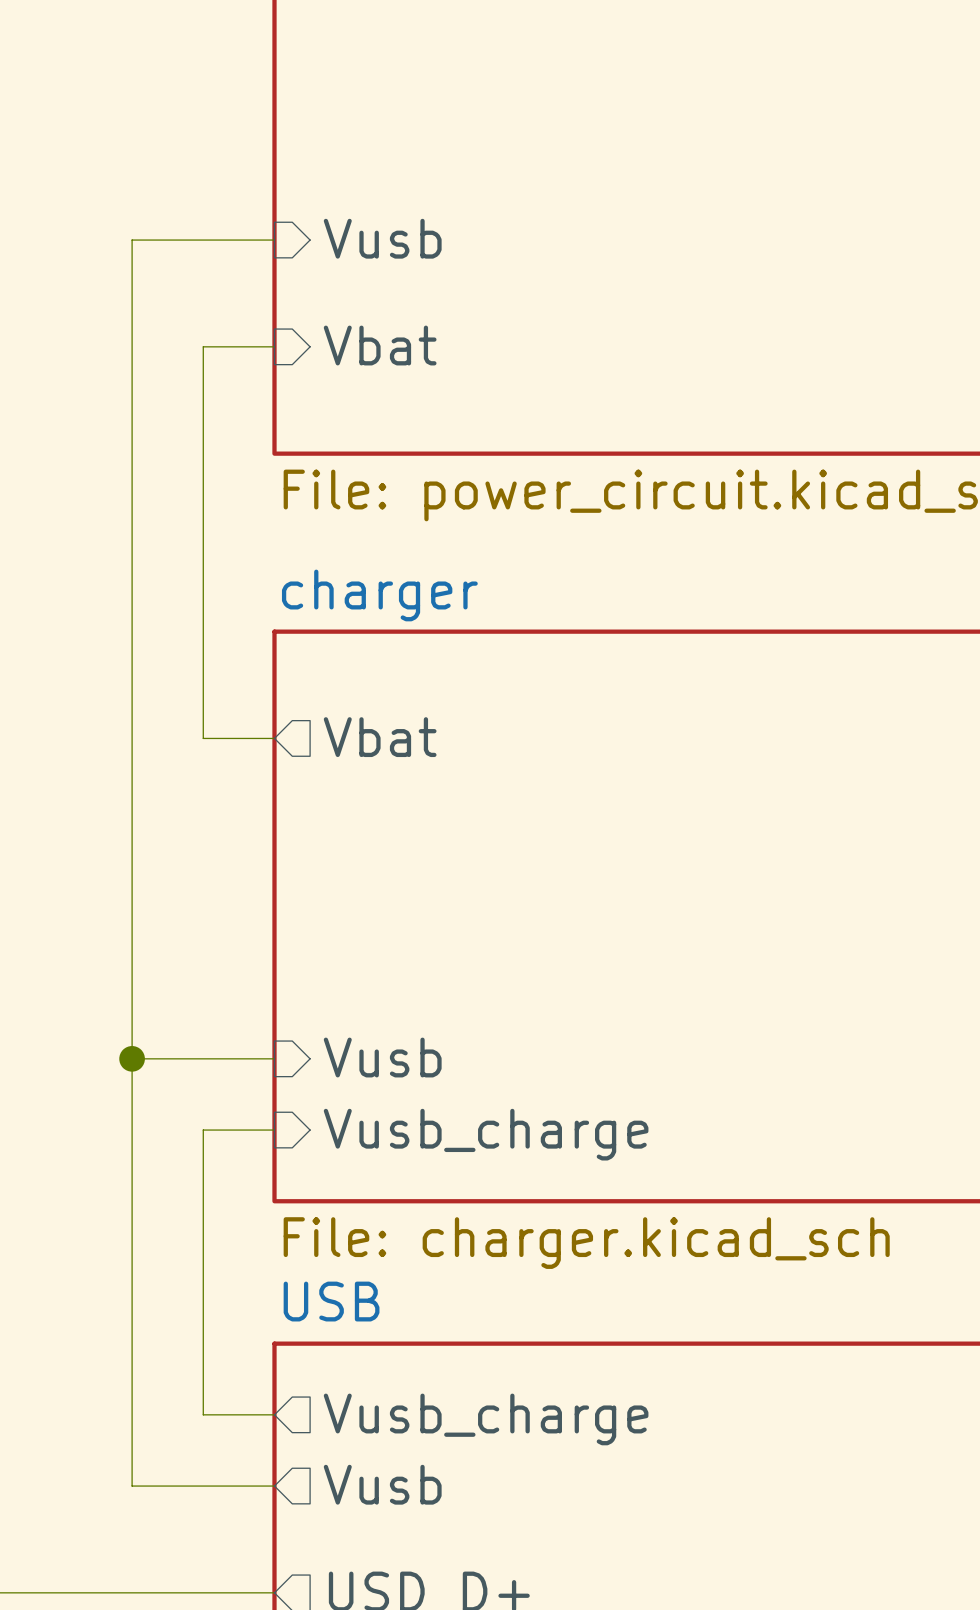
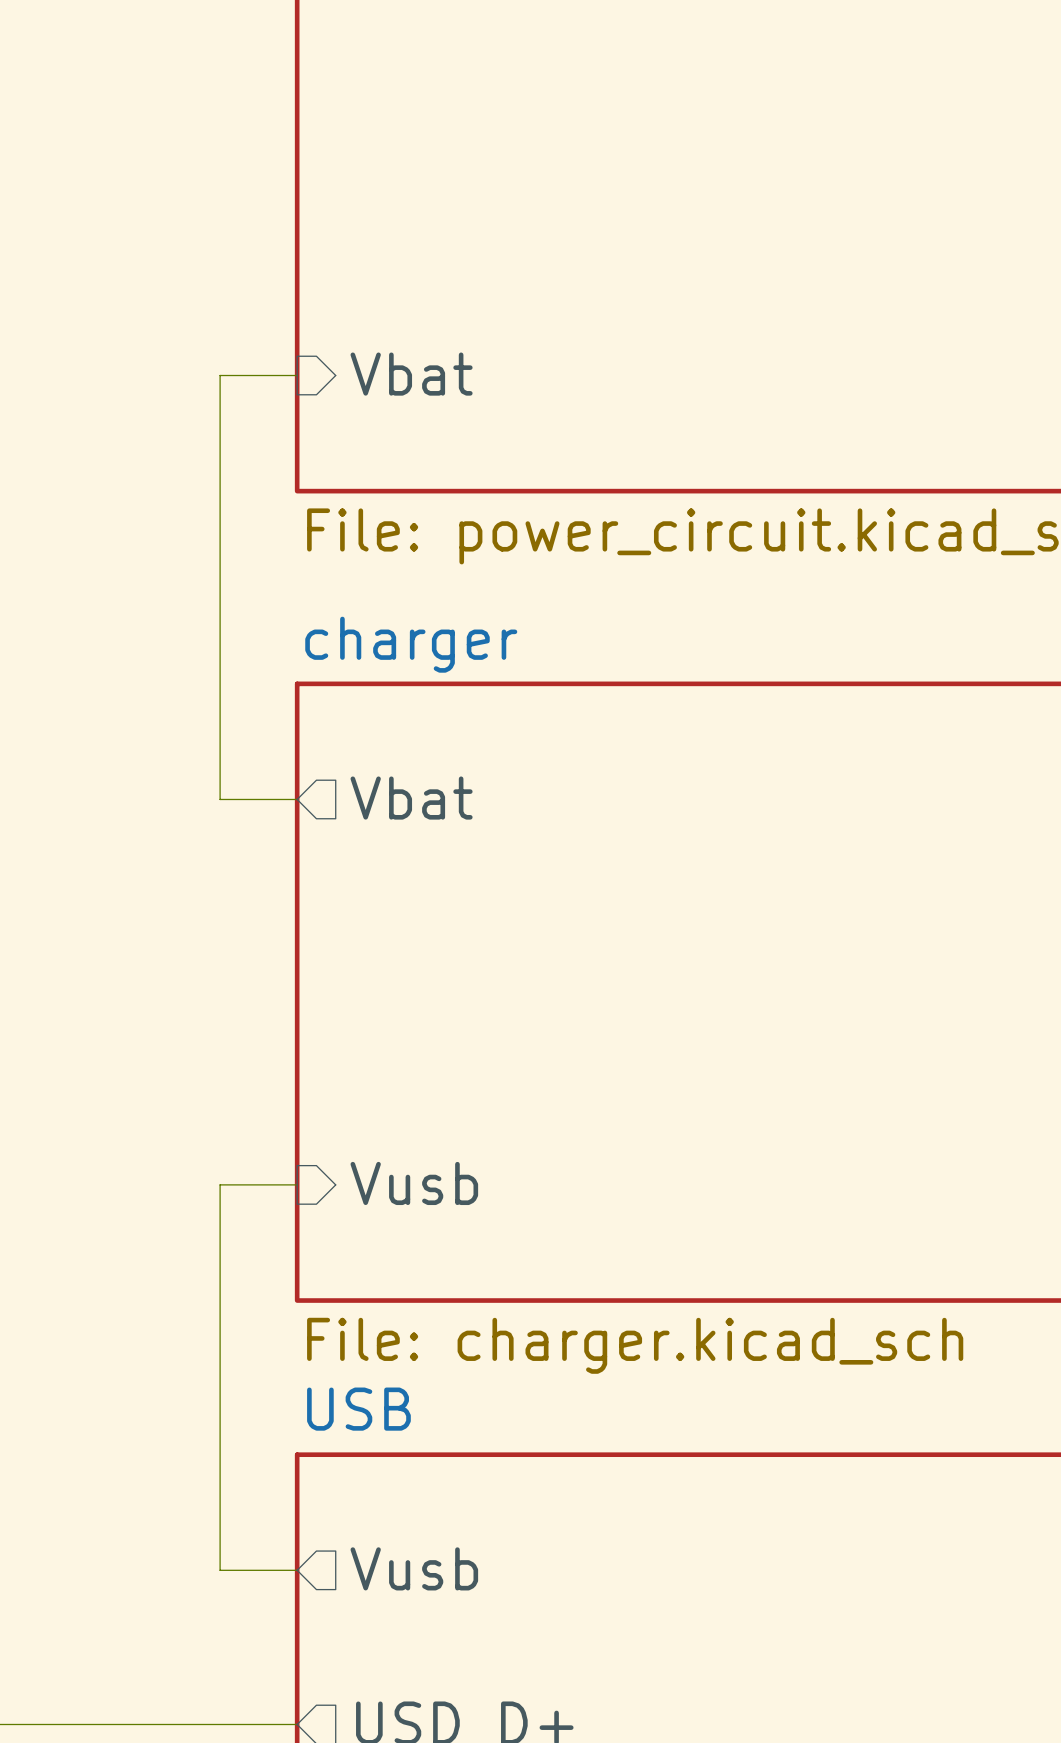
sheet pin: Vusb (382, 238) -> none
wire: (274, 240) (132, 240) (132, 1486) (274, 1486) -> none
sheet pin position: Vusb (382, 1057) -> Vusb (414, 1183)
wire: (132, 1058) (274, 1058) -> none
junction: (132, 1058) -> none
wire: (203, 1130) (274, 1130) -> (220, 1223) (220, 1184) (297, 1184)
sheet pin: Vusb_charge (486, 1134) -> none
wire: (203, 1414) (274, 1414) -> (220, 1531) (220, 1570) (297, 1570)
sheet pin: Vusb_charge (486, 1419) -> none
sheet pin position: Vusb (382, 1484) -> Vusb (414, 1568)

